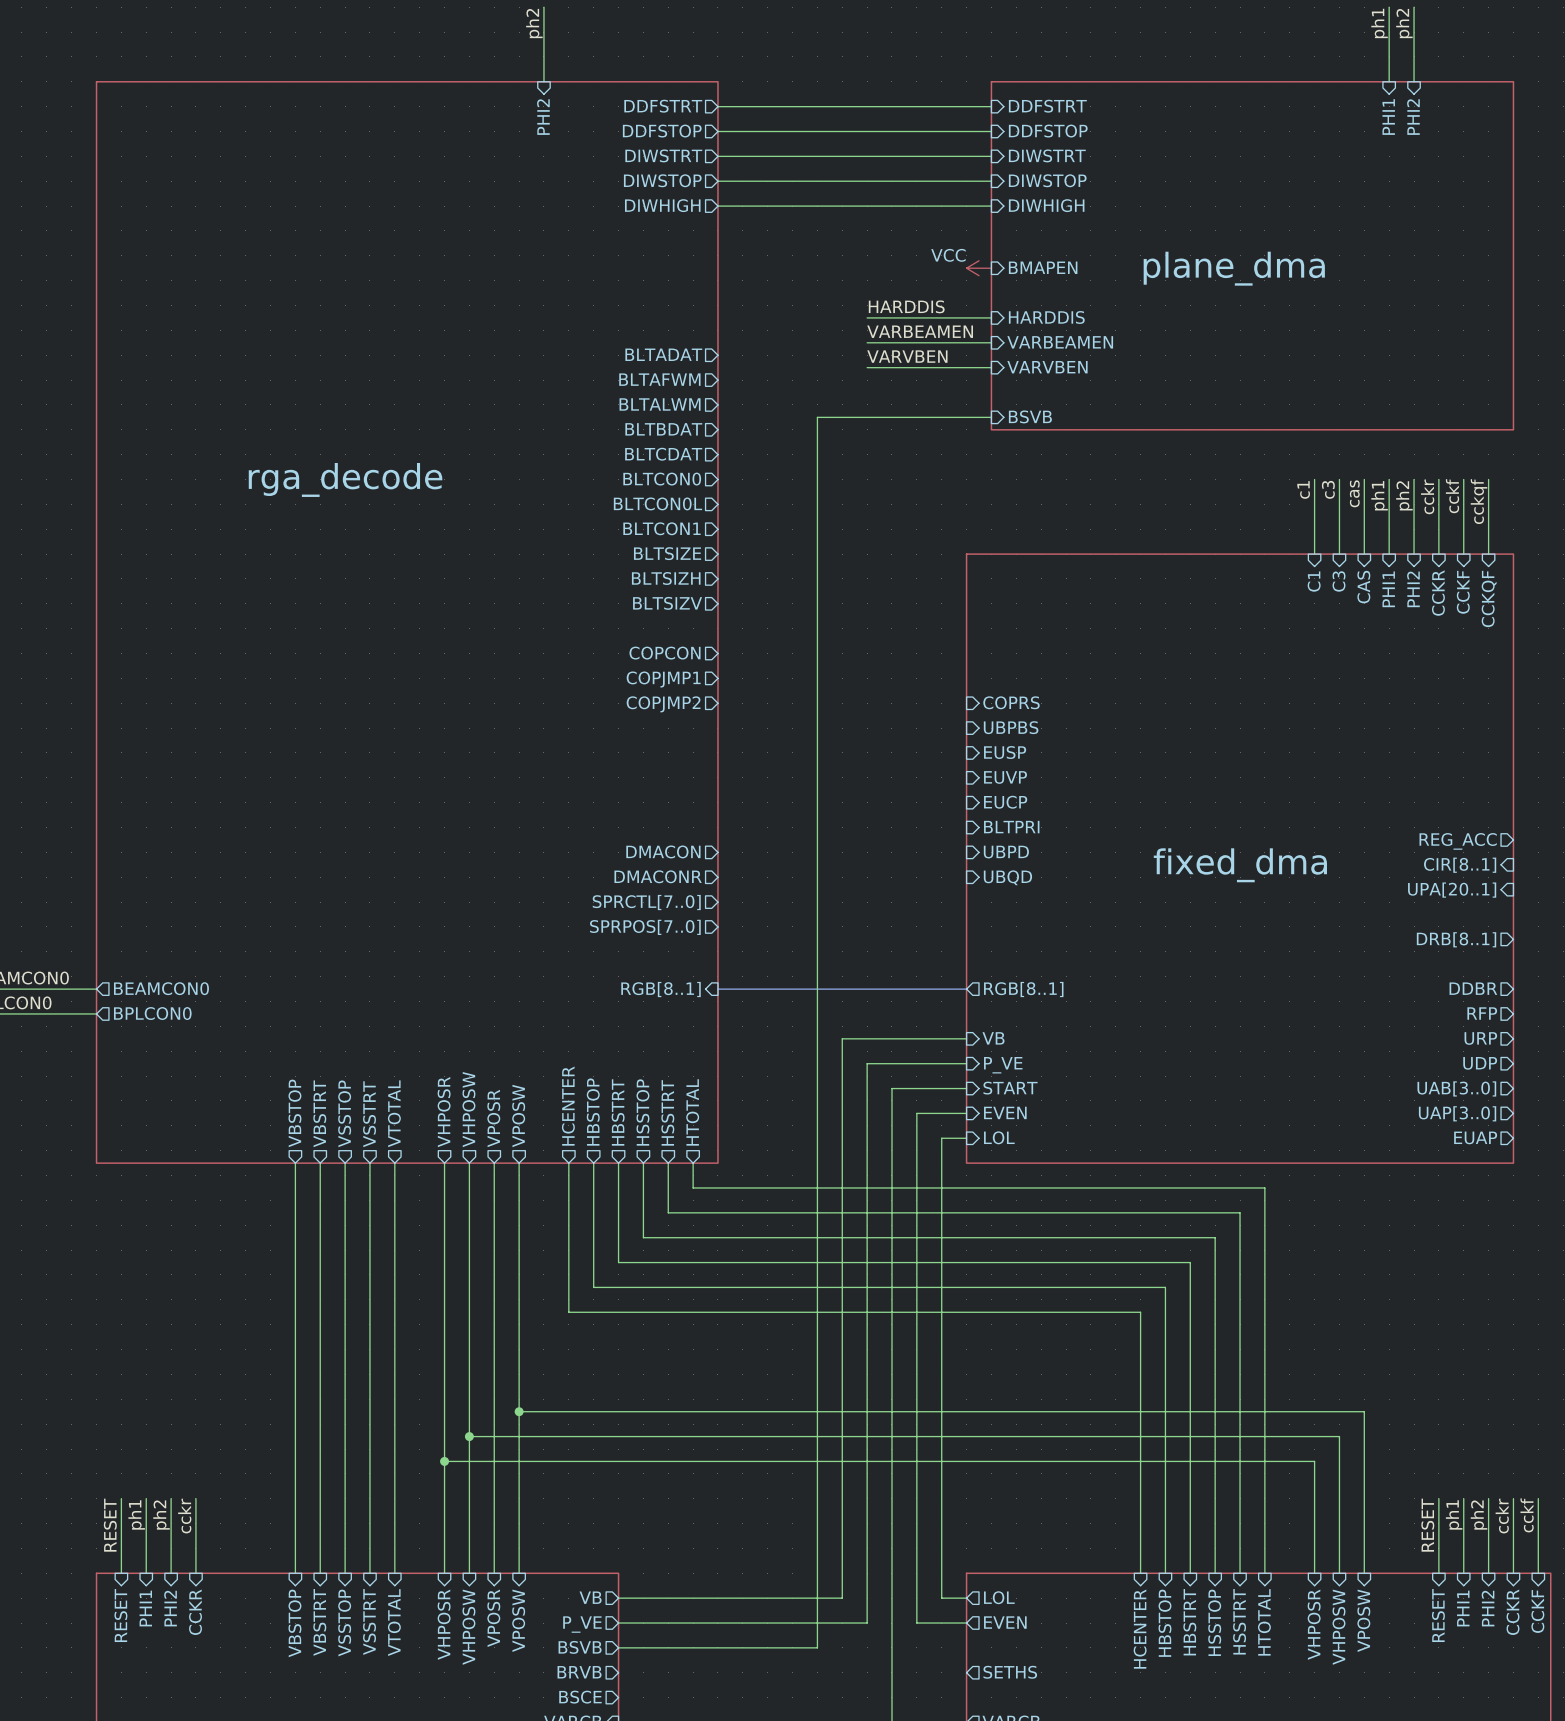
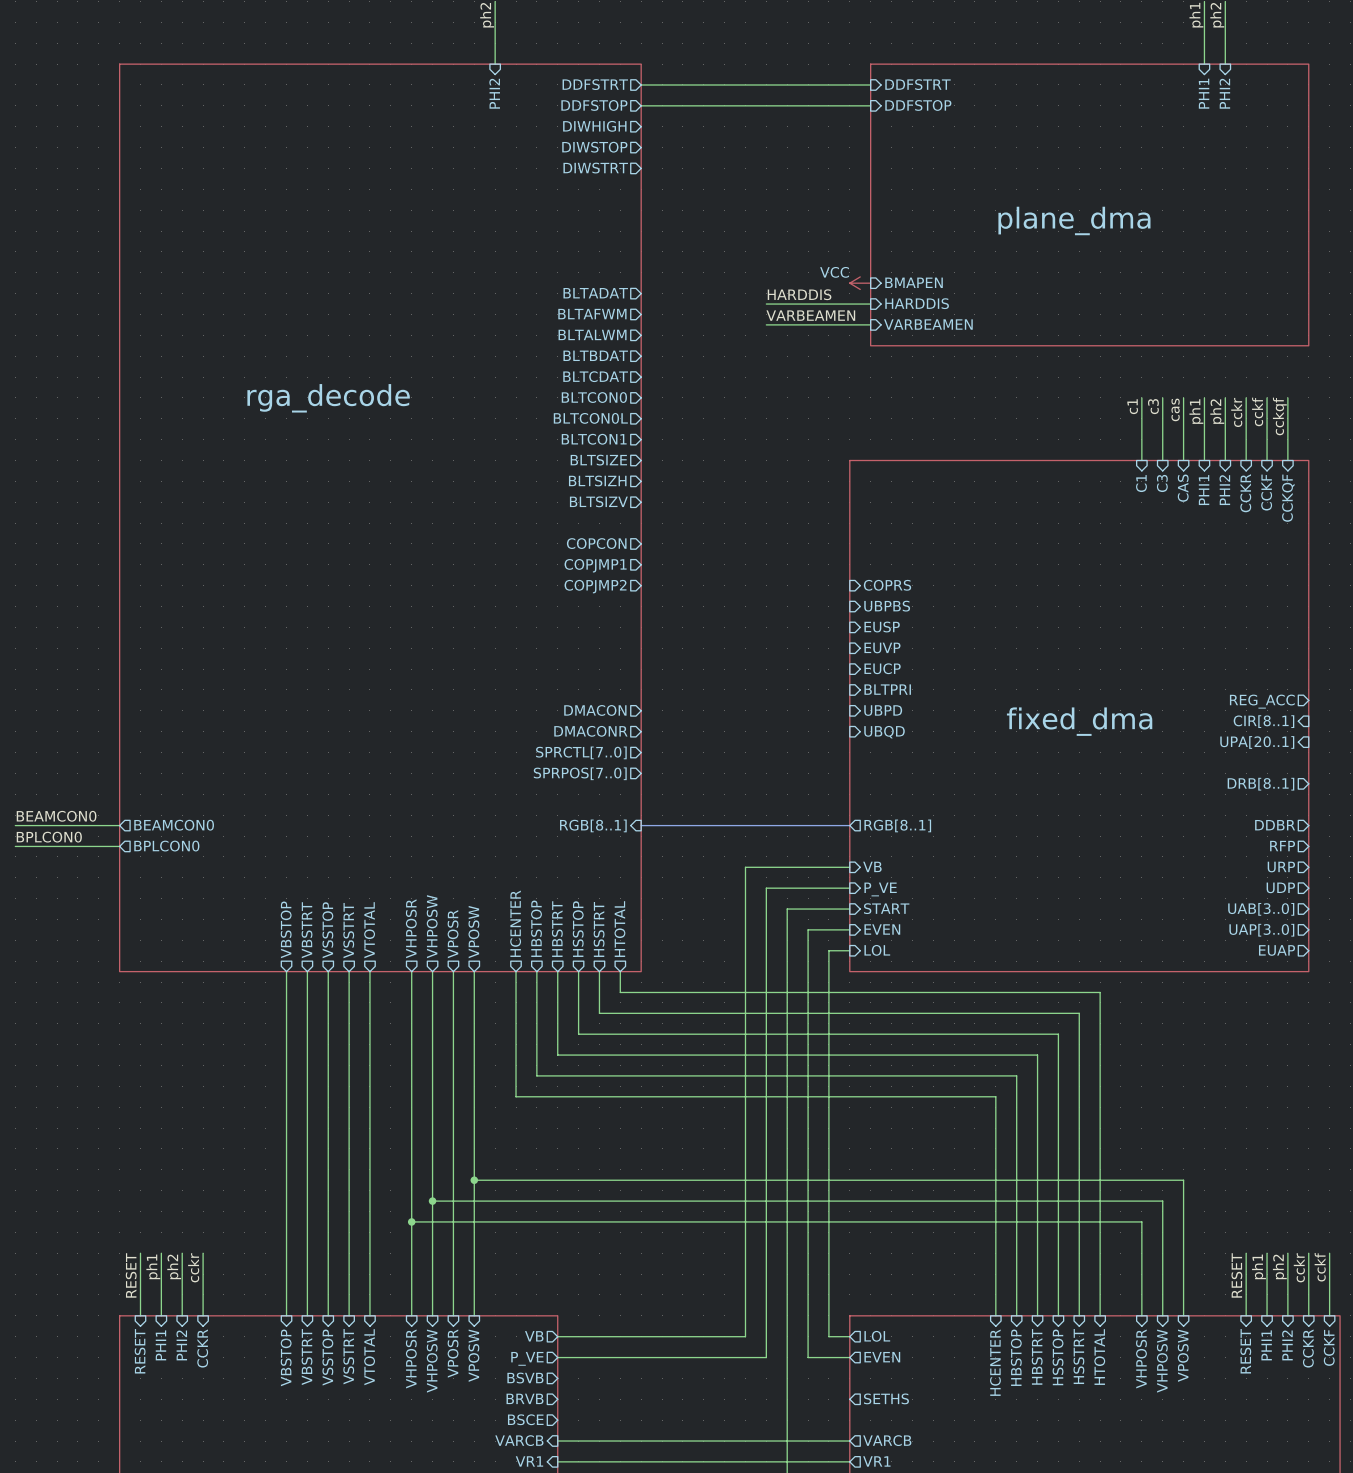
sheet plane_dma shape: [990, 81, 1515, 431] -> [870, 63, 1310, 347]
sheet pin: DIWSTRT (663, 155) -> DIWHIGH (594, 126)
sheet pin: DIWSTRT (1047, 155) -> none
wire: (717, 156) (991, 156) -> none
sheet pin: DIWSTOP (1047, 180) -> none
wire: (717, 181) (991, 181) -> none
sheet pin: DIWHIGH (662, 205) -> DIWSTRT (595, 168)
sheet pin: DIWHIGH (1046, 205) -> none
wire: (717, 206) (991, 206) -> none
sheet pin: BMAPEN (1043, 267) -> none
power symbol position: VCC (979, 268) -> VCC (860, 283)
label: HARDDIS (906, 306) -> none
wire: (867, 317) (991, 317) -> none
sheet pin: HARDDIS (1046, 317) -> none
label position: VARBEAMEN (920, 331) -> VARBEAMEN (810, 315)
wire: (867, 342) (991, 342) -> (766, 324) (870, 324)
sheet pin: VARBEAMEN (1060, 342) -> BMAPEN (914, 282)
label: VARVBEN (907, 356) -> HARDDIS (799, 294)
sheet pin: VARVBEN (1047, 367) -> HARDDIS (917, 303)
sheet pin: none -> VARBEAMEN (928, 324)
sheet pin: BSVB (1030, 416) -> none
wire: (991, 417) (817, 417) (817, 1647) (618, 1647) -> none

